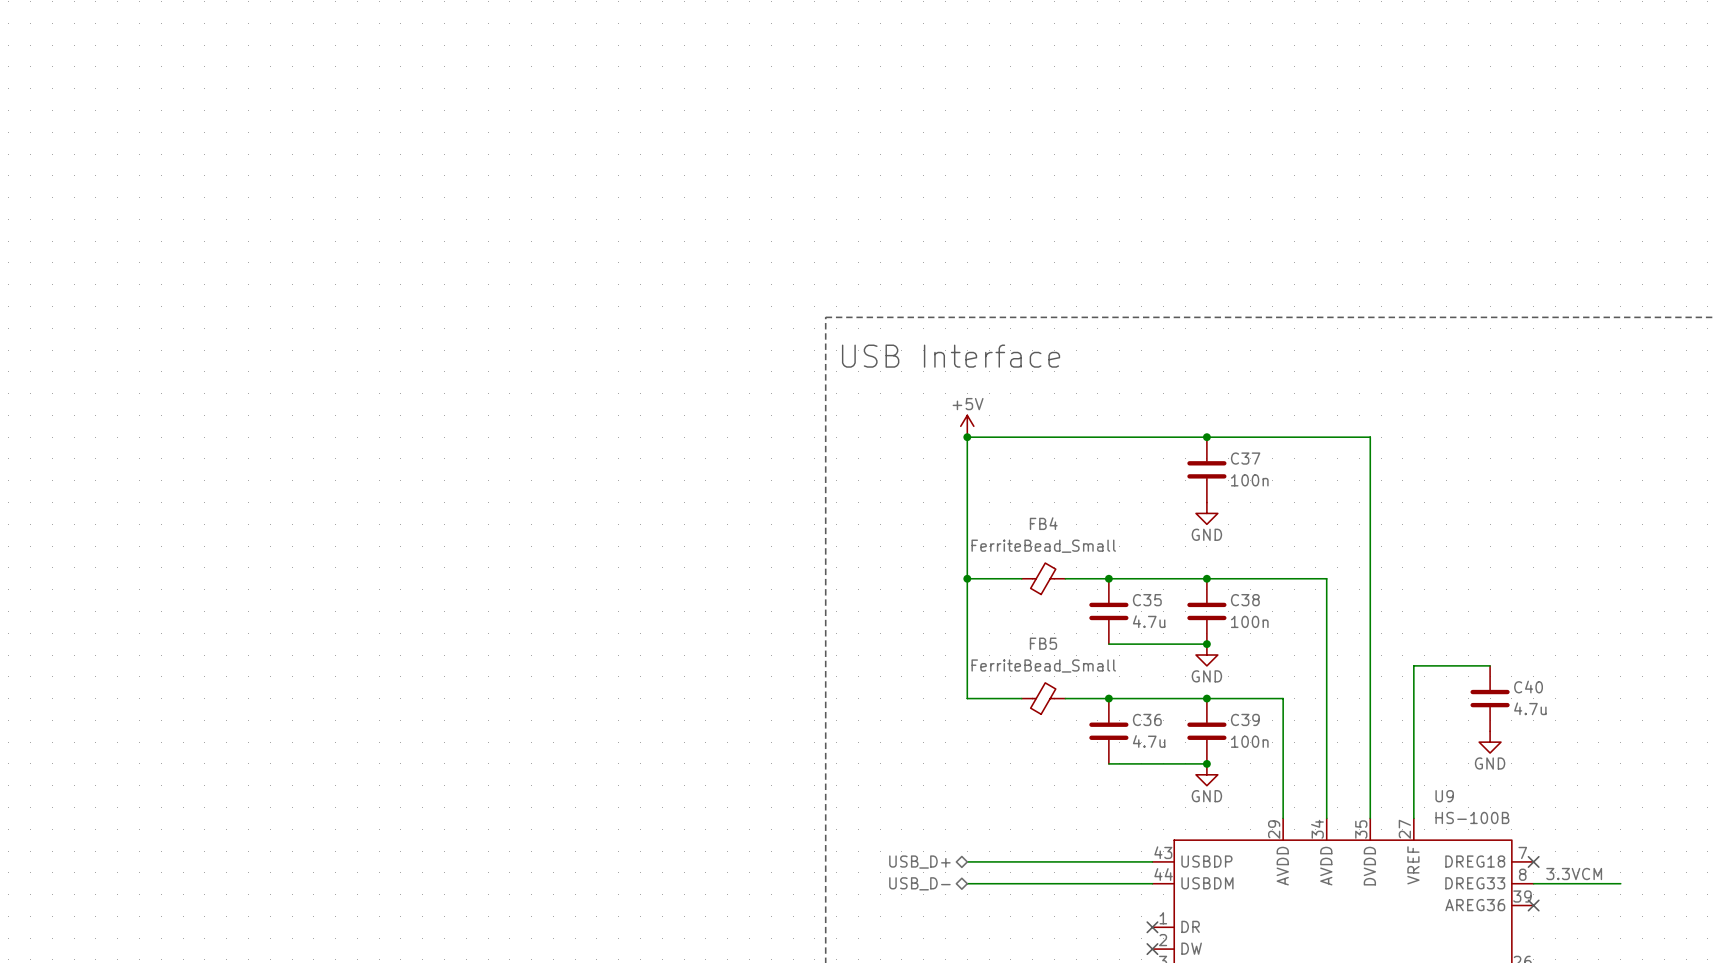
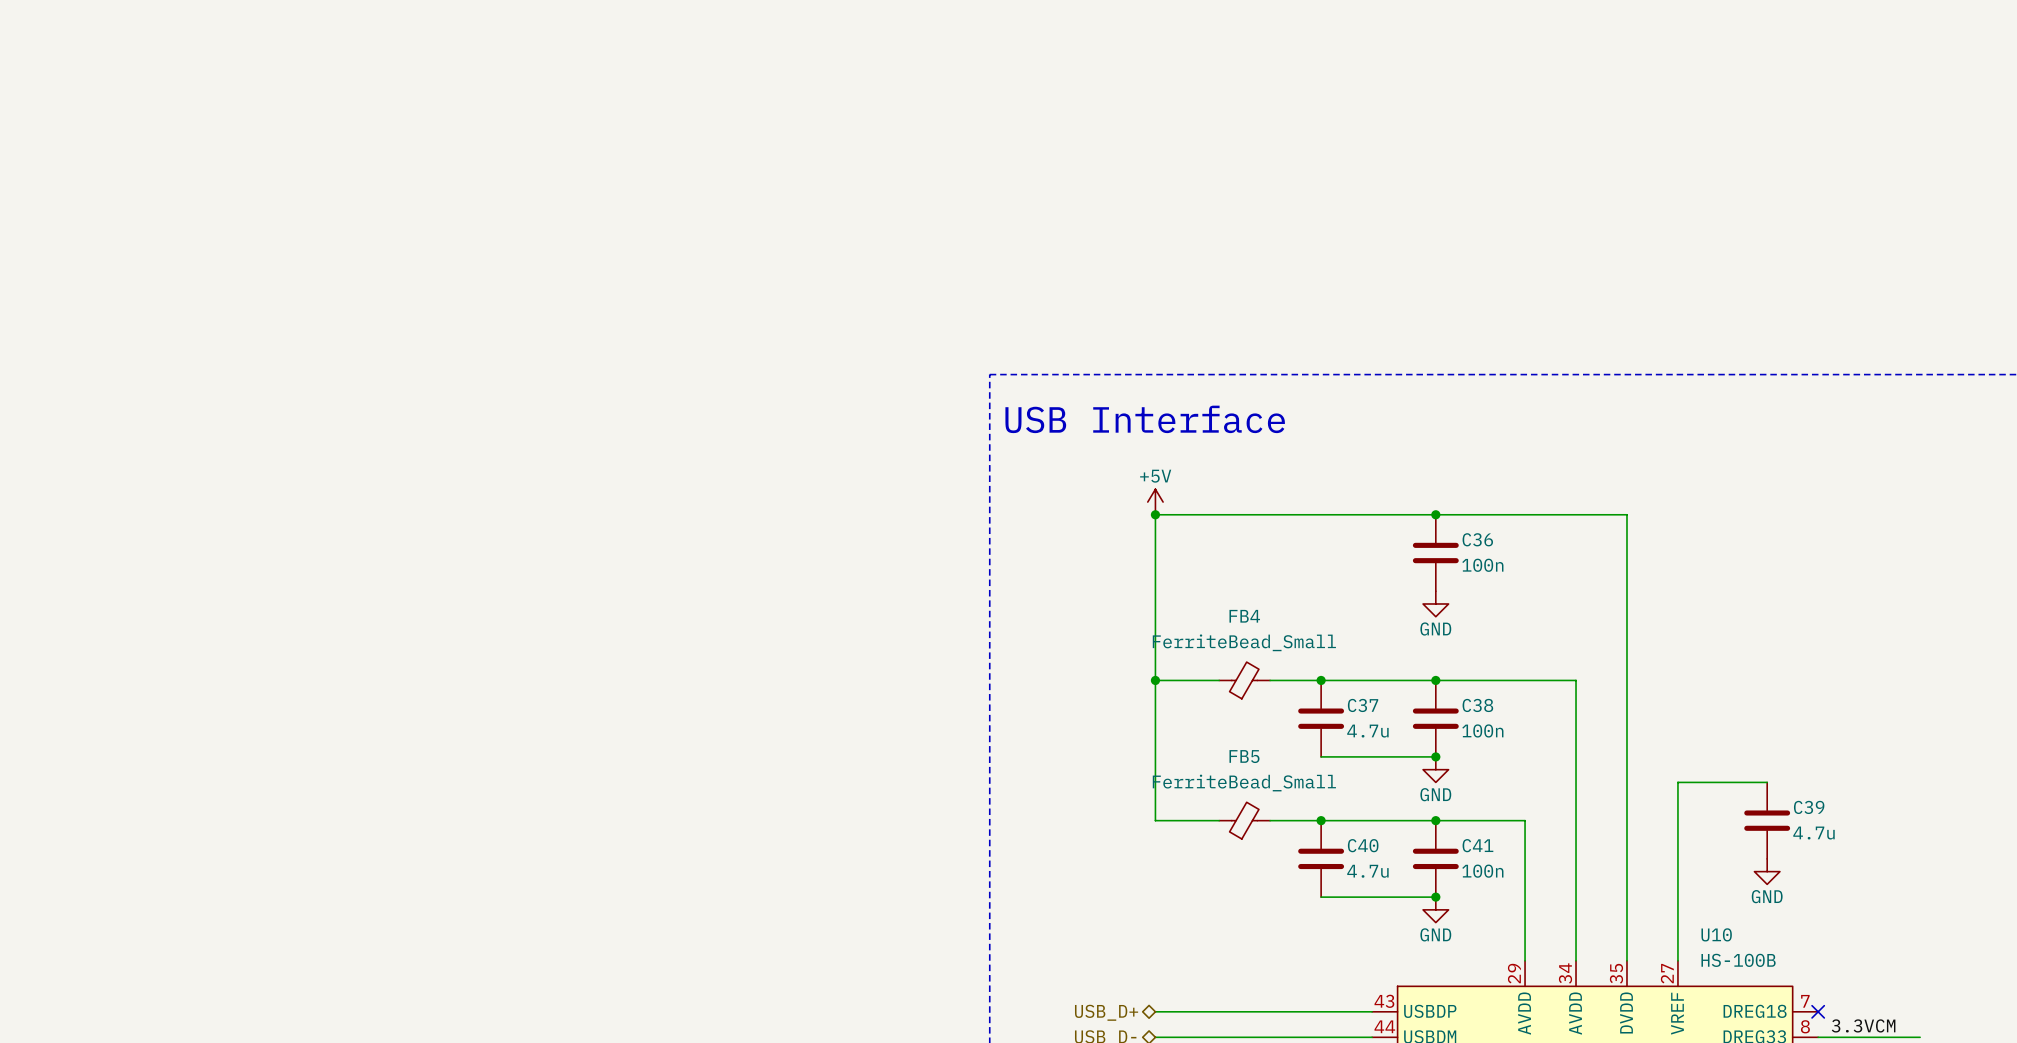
C37 name: C37 (1245, 458) -> C36 (1477, 539)
C35 name: C35 (1147, 600) -> C37 (1363, 705)
C40 name: C40 (1528, 687) -> C39 (1809, 807)
C36 name: C36 (1147, 719) -> C40 (1363, 845)
C39 name: C39 (1245, 719) -> C41 (1477, 845)
U9 name: U9 (1444, 796) -> U10 (1716, 934)

